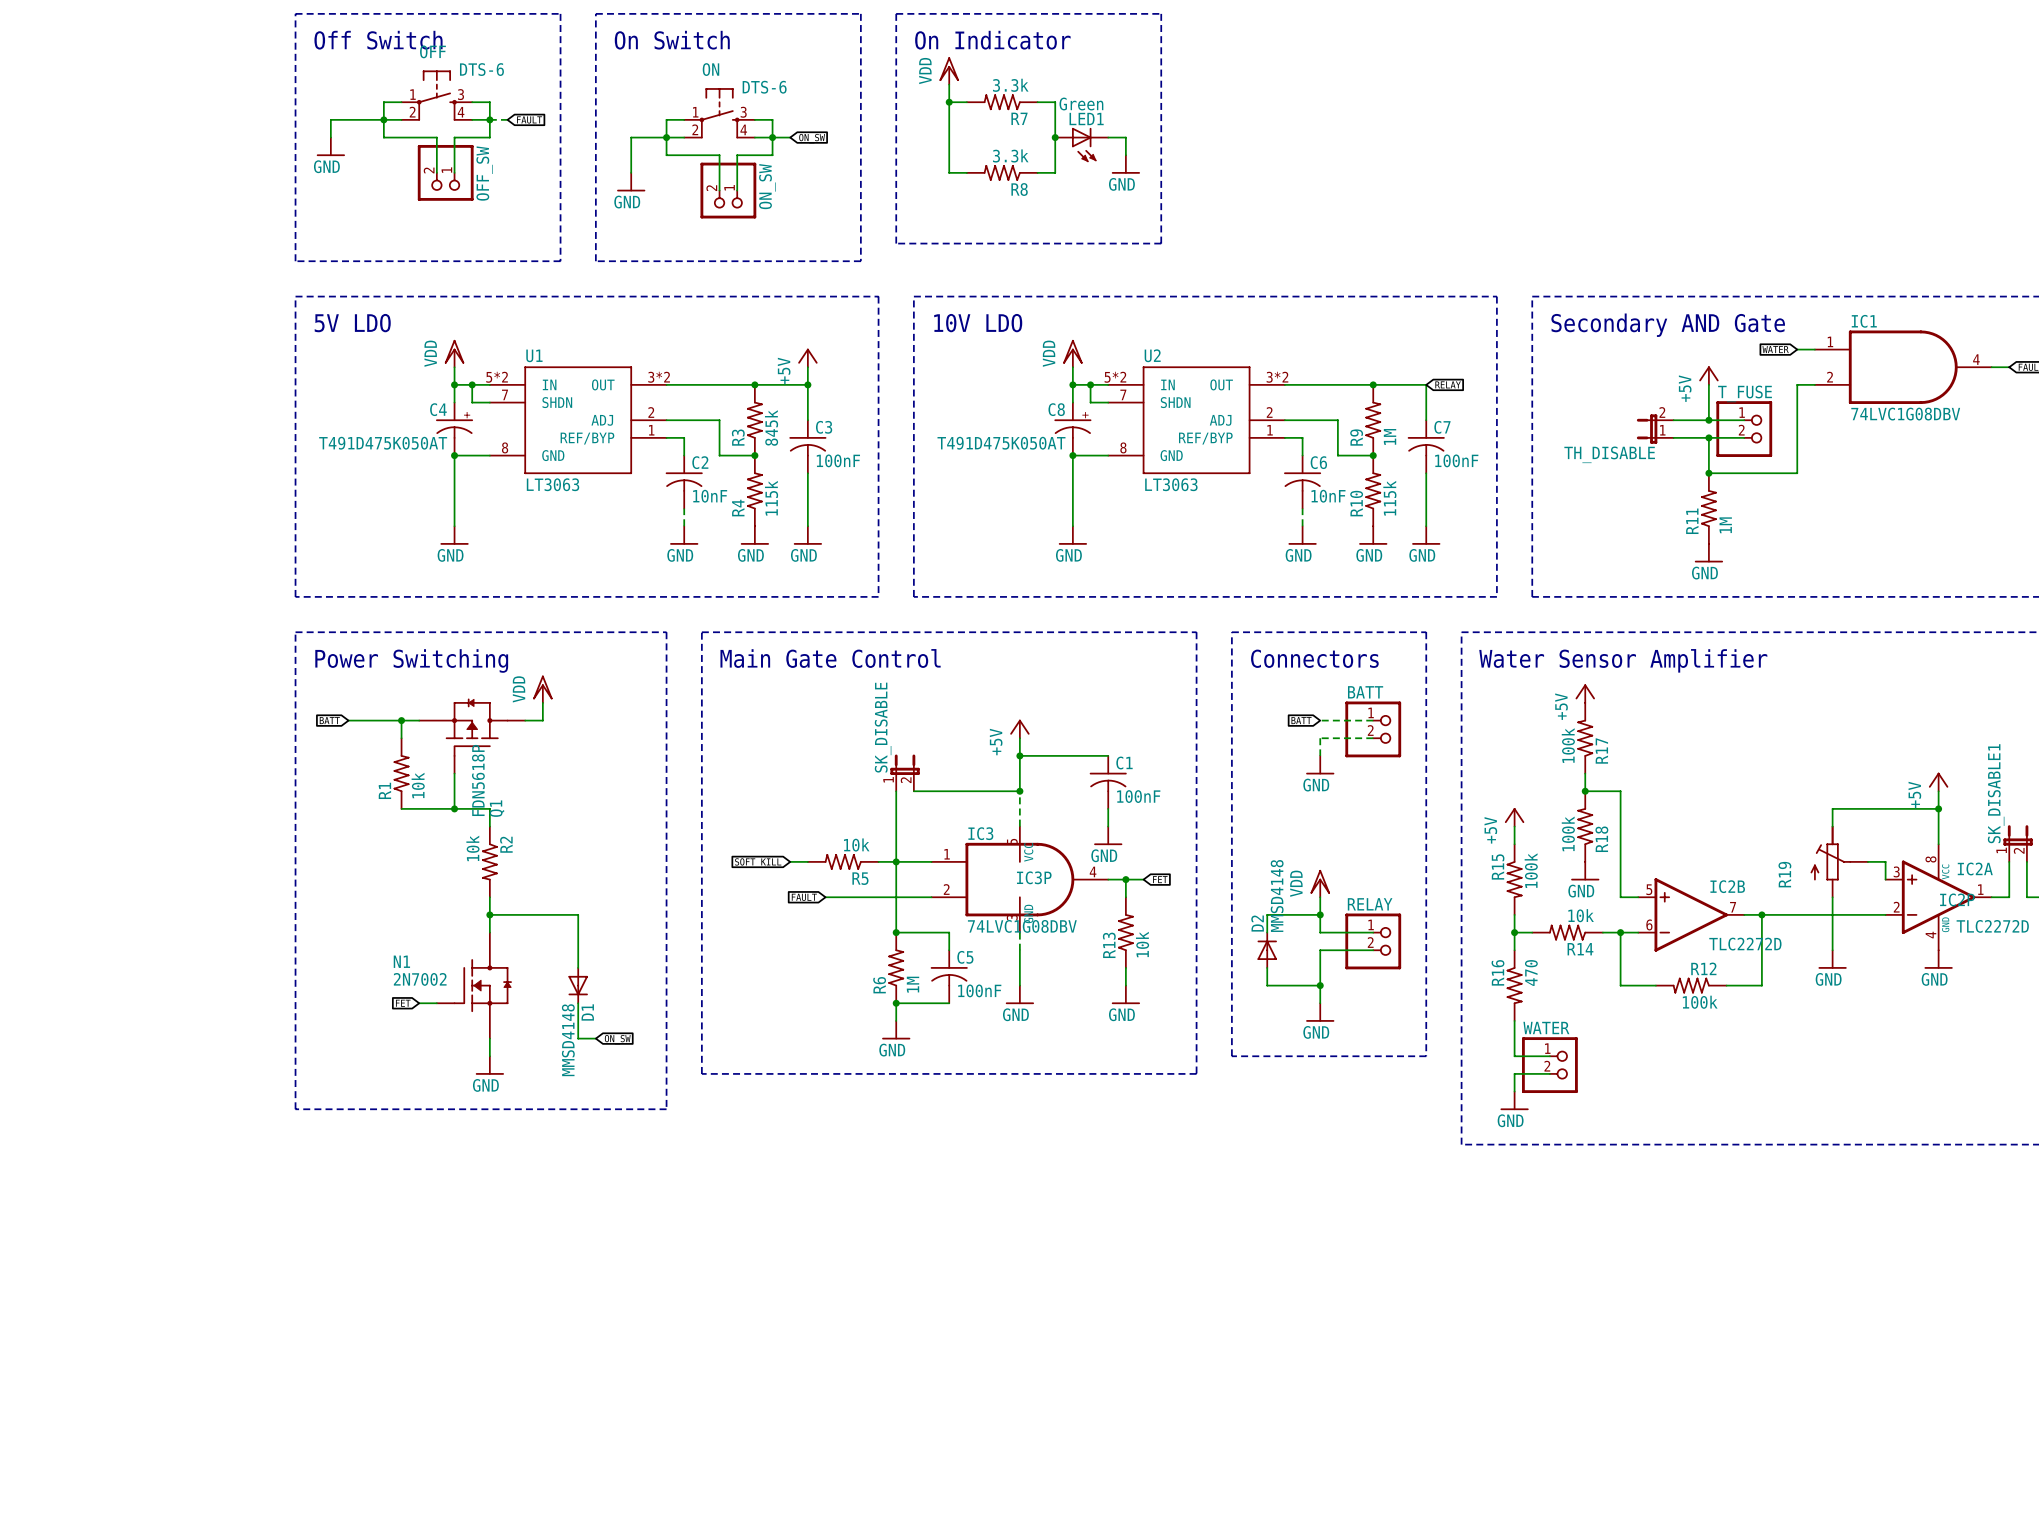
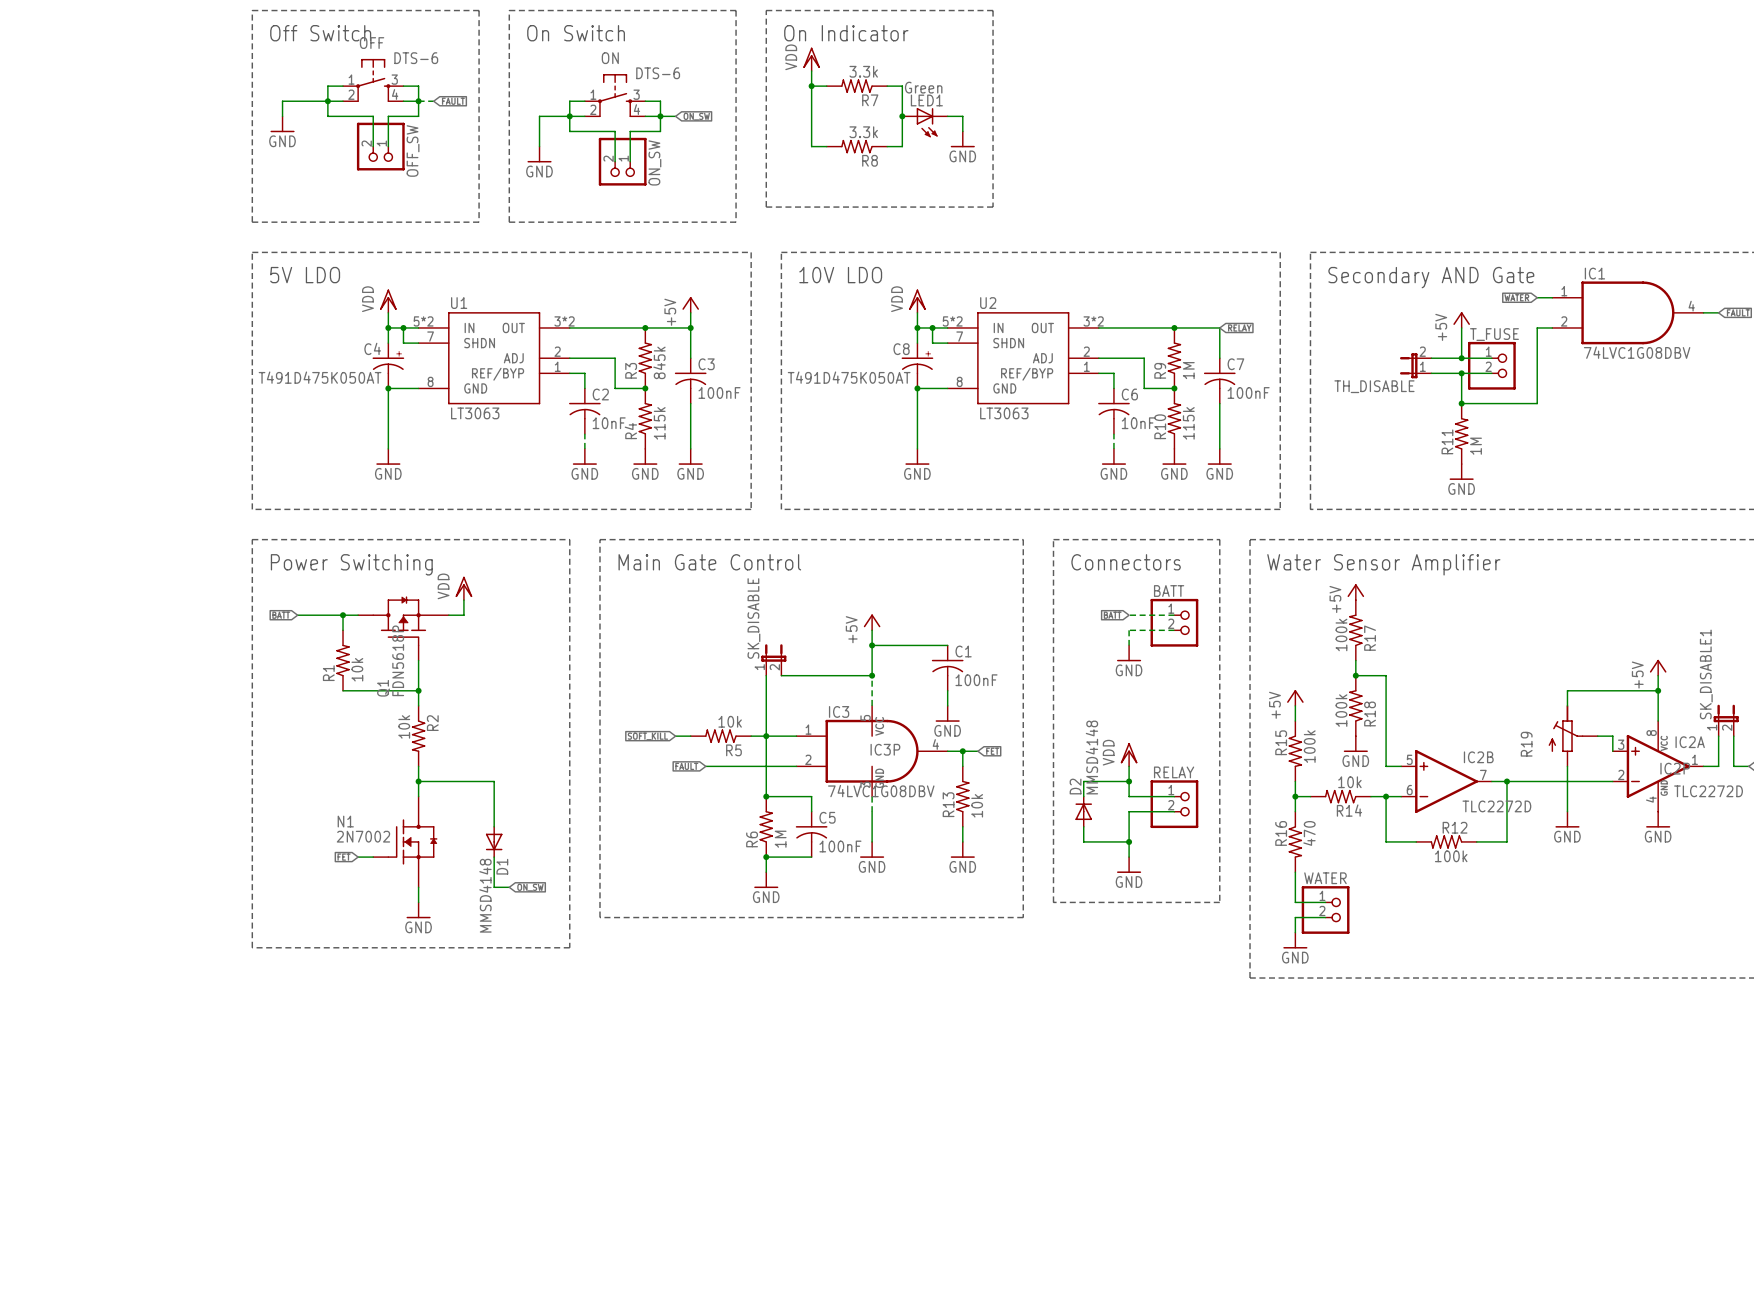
Q1 flip: as is (476, 727) -> left-right (399, 621)
wire: (454, 773) (454, 808) -> (418, 660) (418, 690)
junction position: (454, 808) -> (418, 690)

